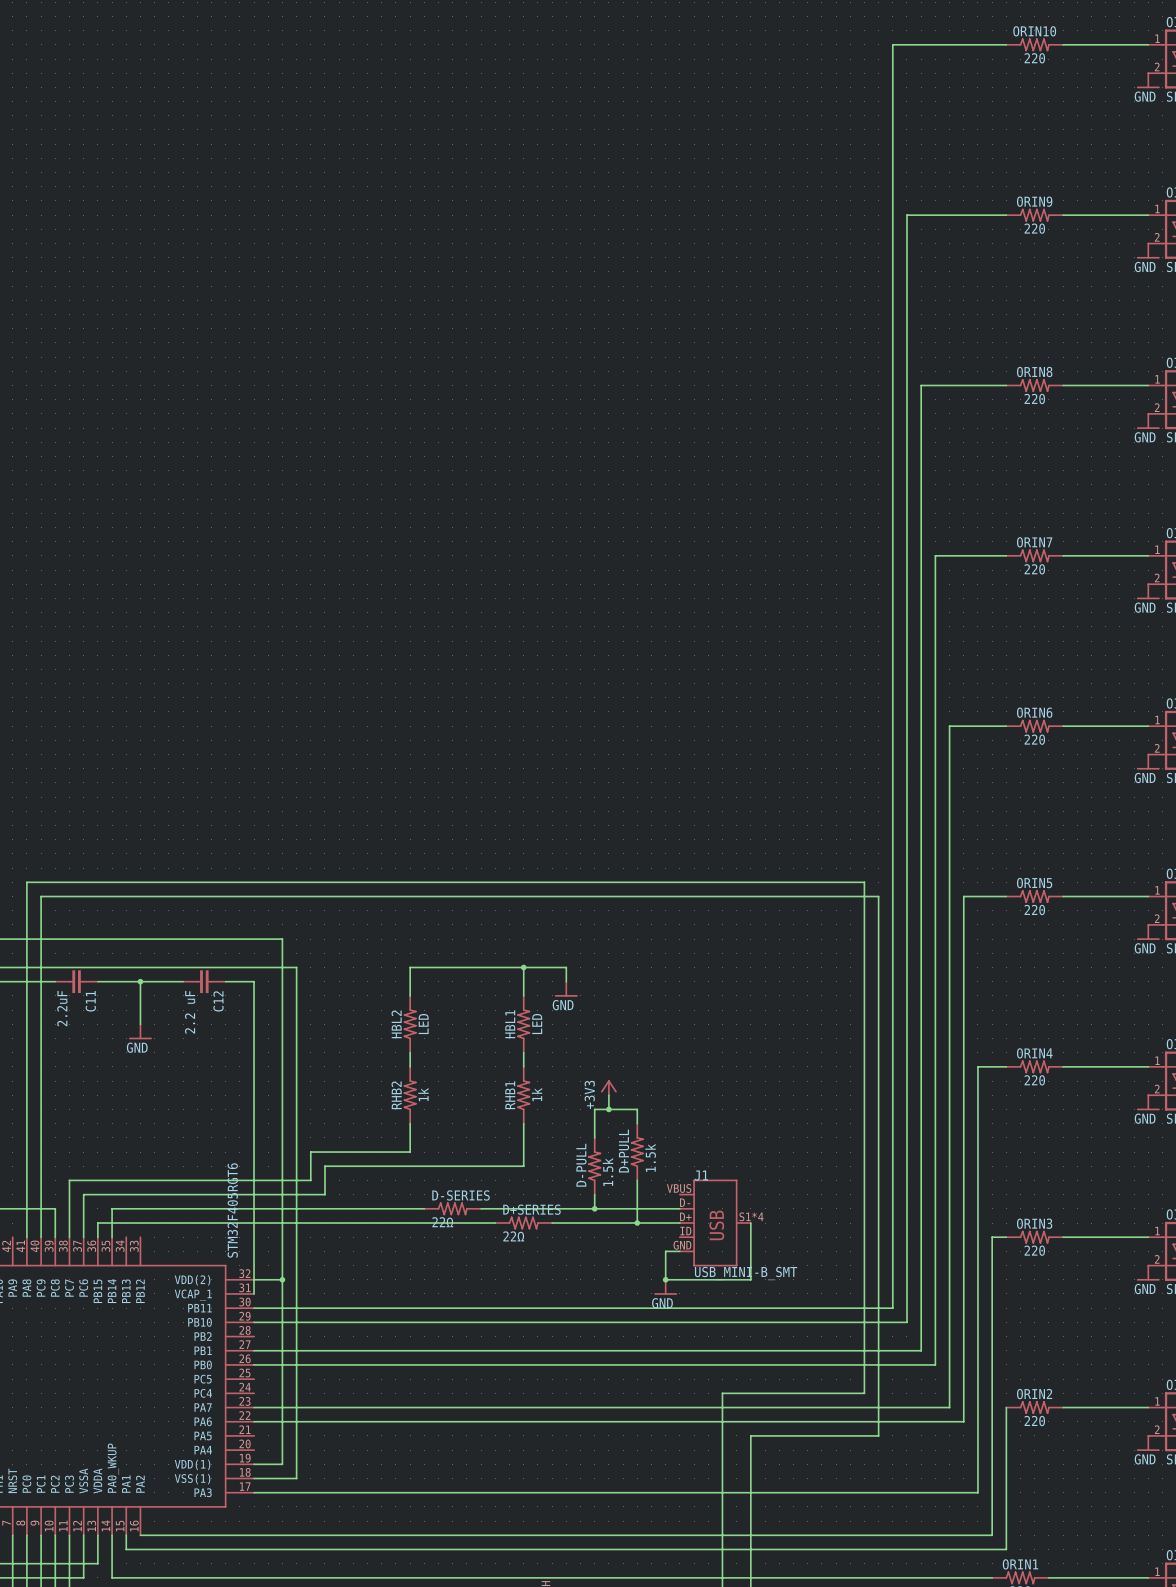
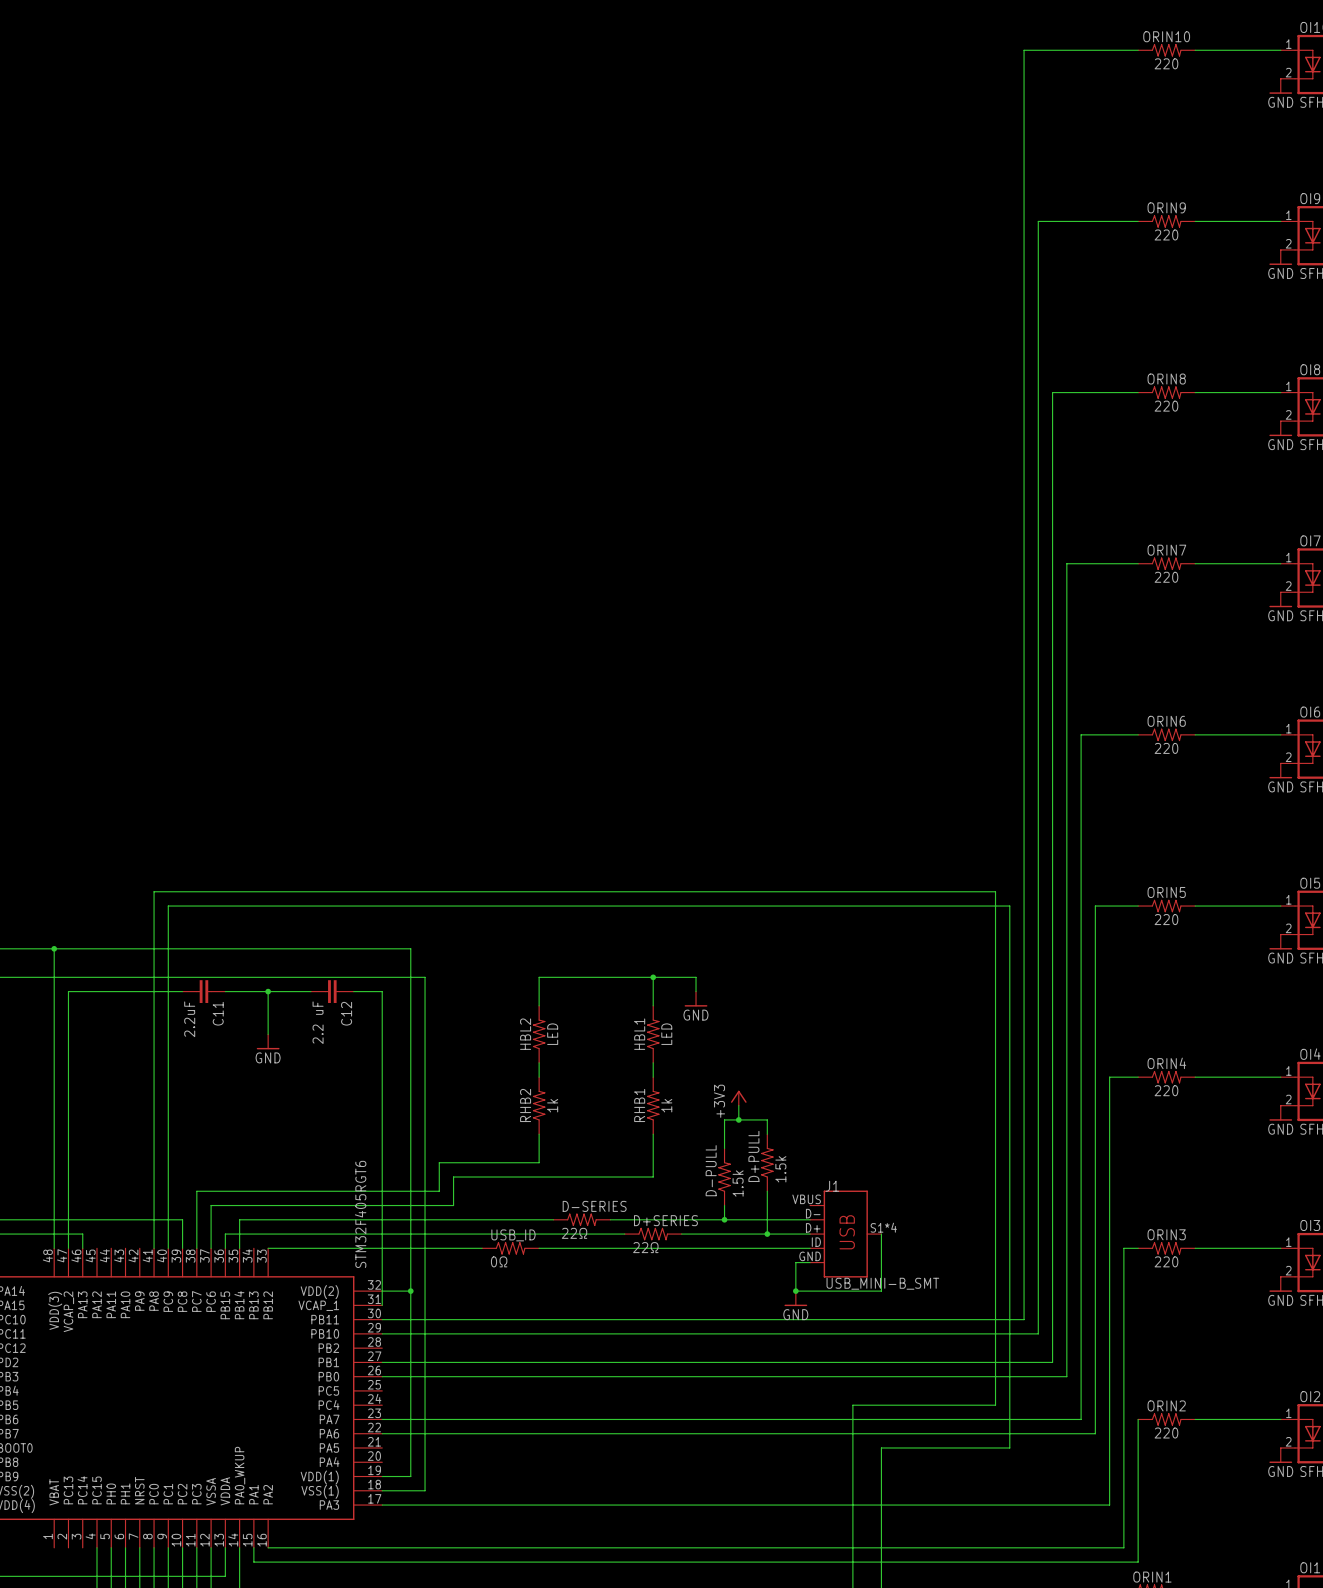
wire: none -> (268, 1248) (482, 1248)
USB_ID: none -> 0Ω (510, 1248)
wire: none -> (539, 1248) (810, 1248)

